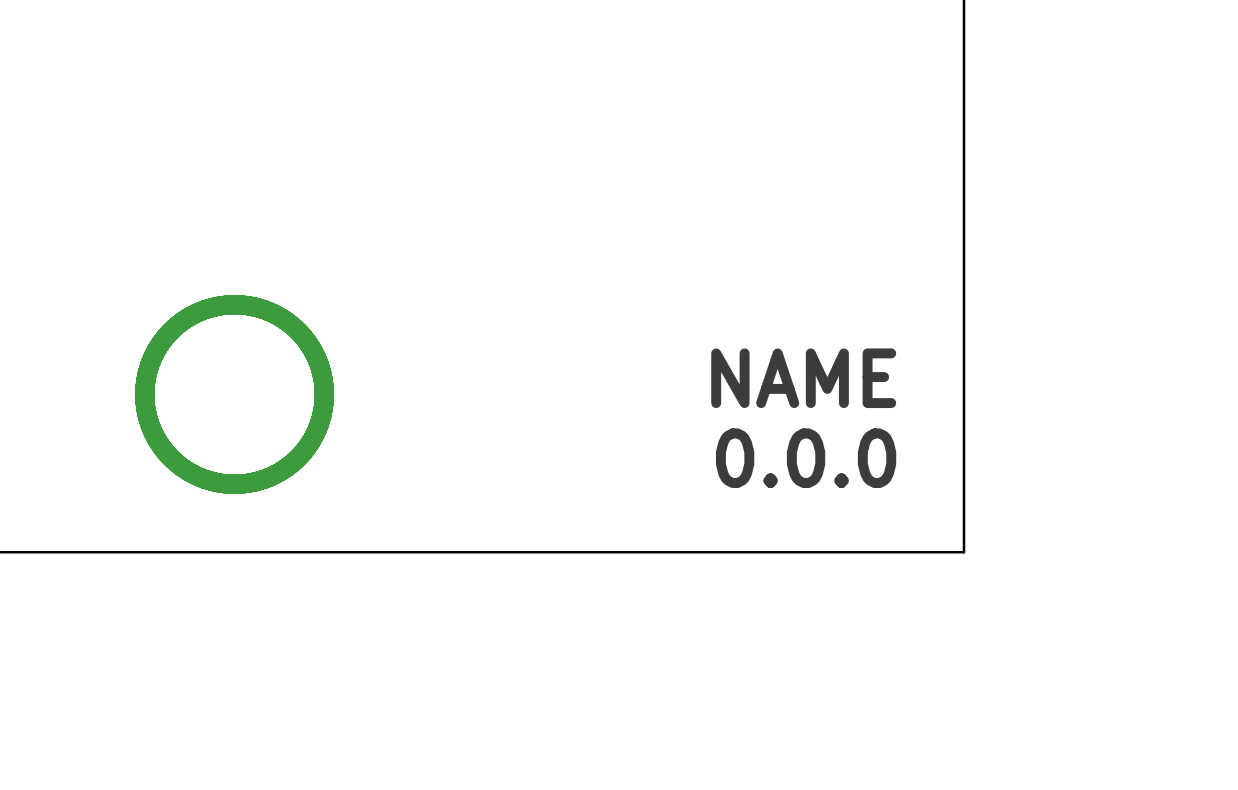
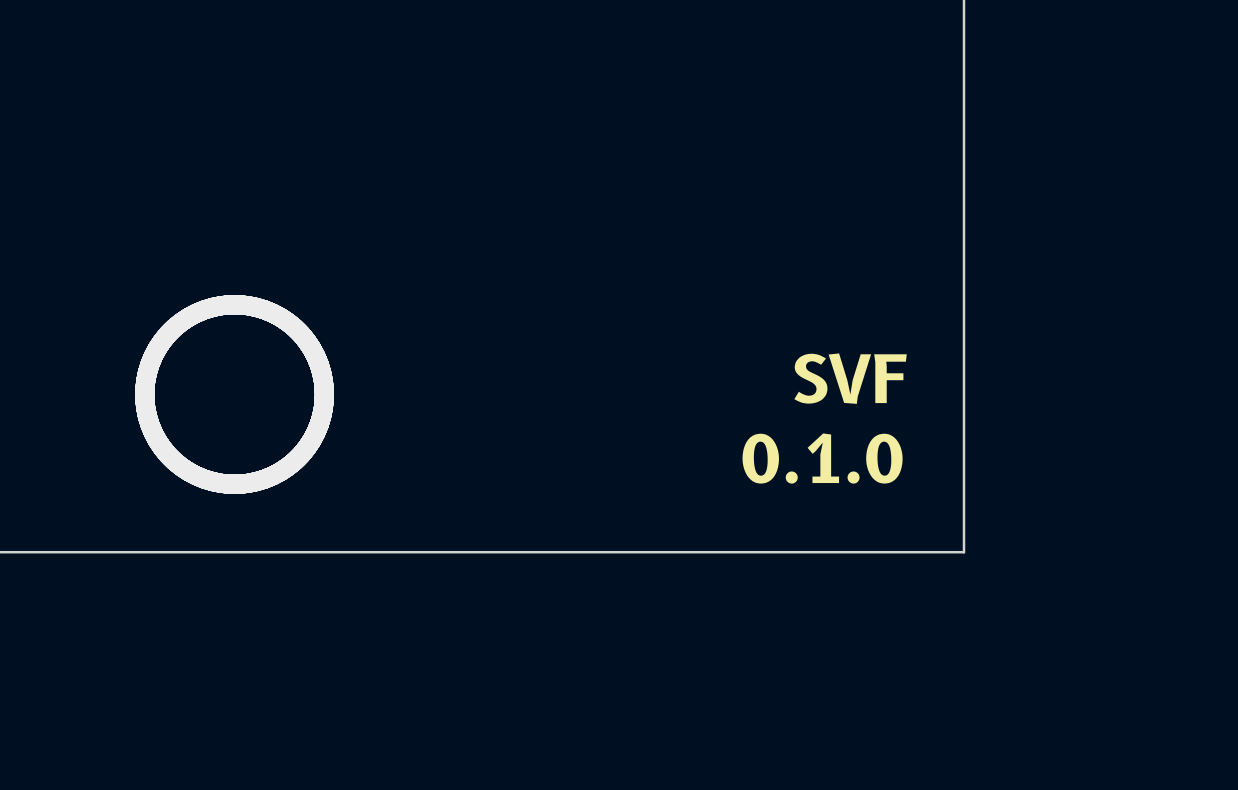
text: NAME (803, 378) -> SVF (850, 378)
text: 0.0.0 (806, 458) -> 0.1.0 (822, 458)

